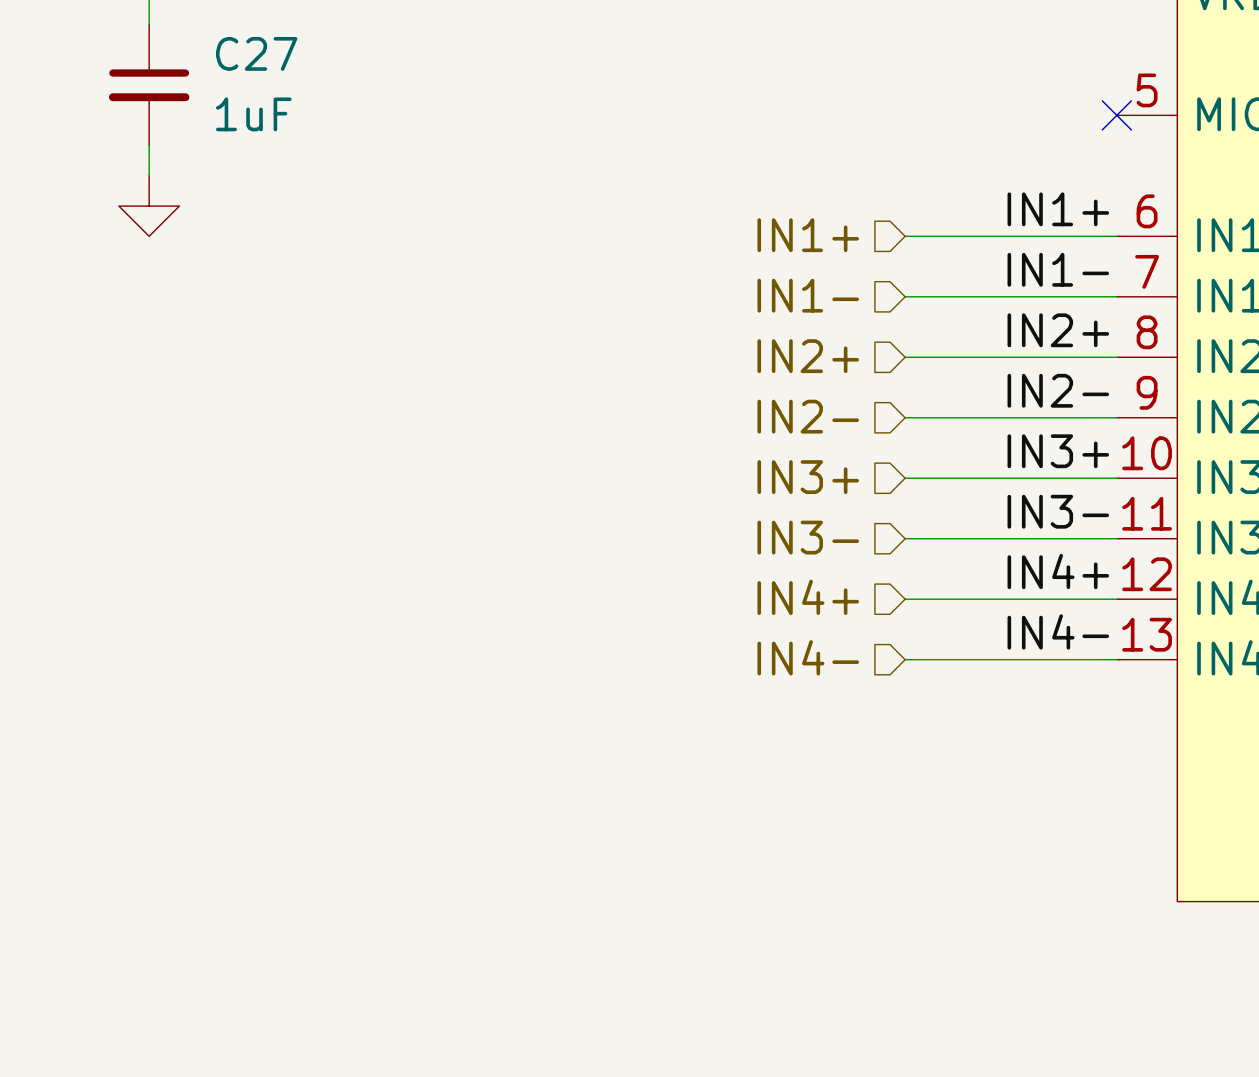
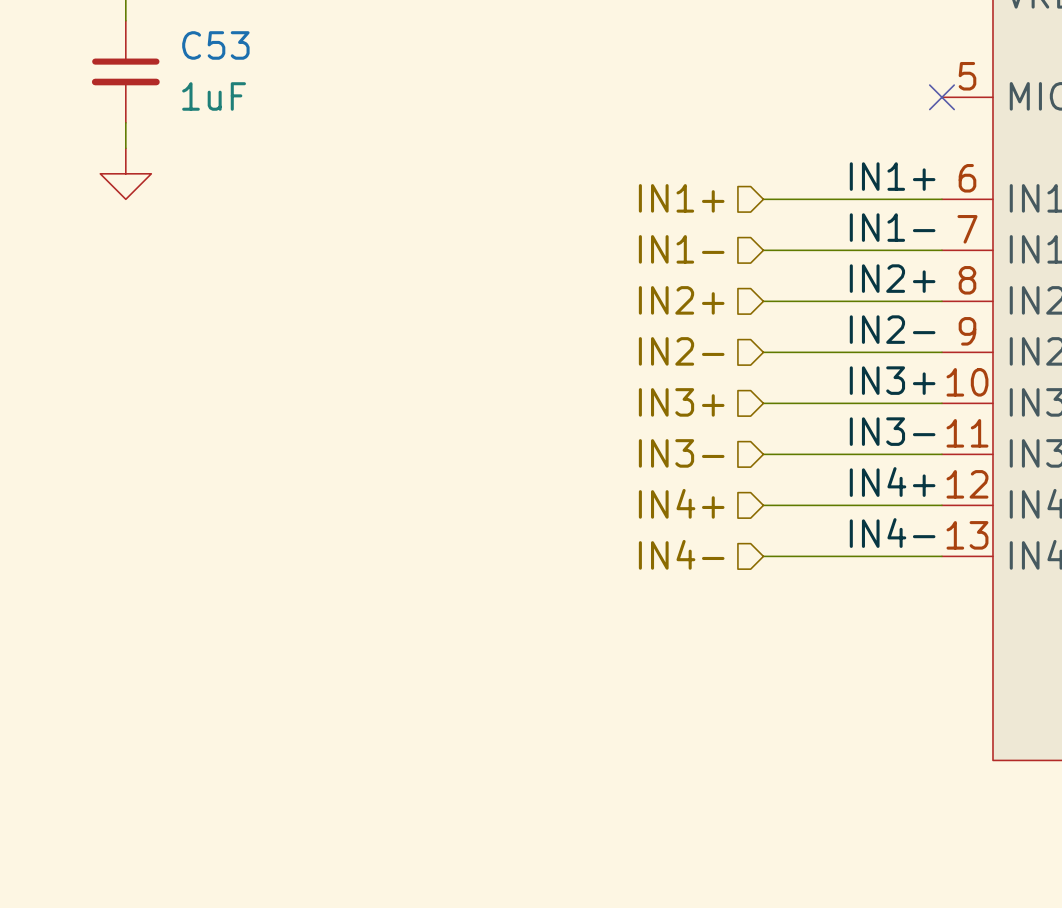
C27 name: C27 (256, 53) -> C53 (215, 45)

